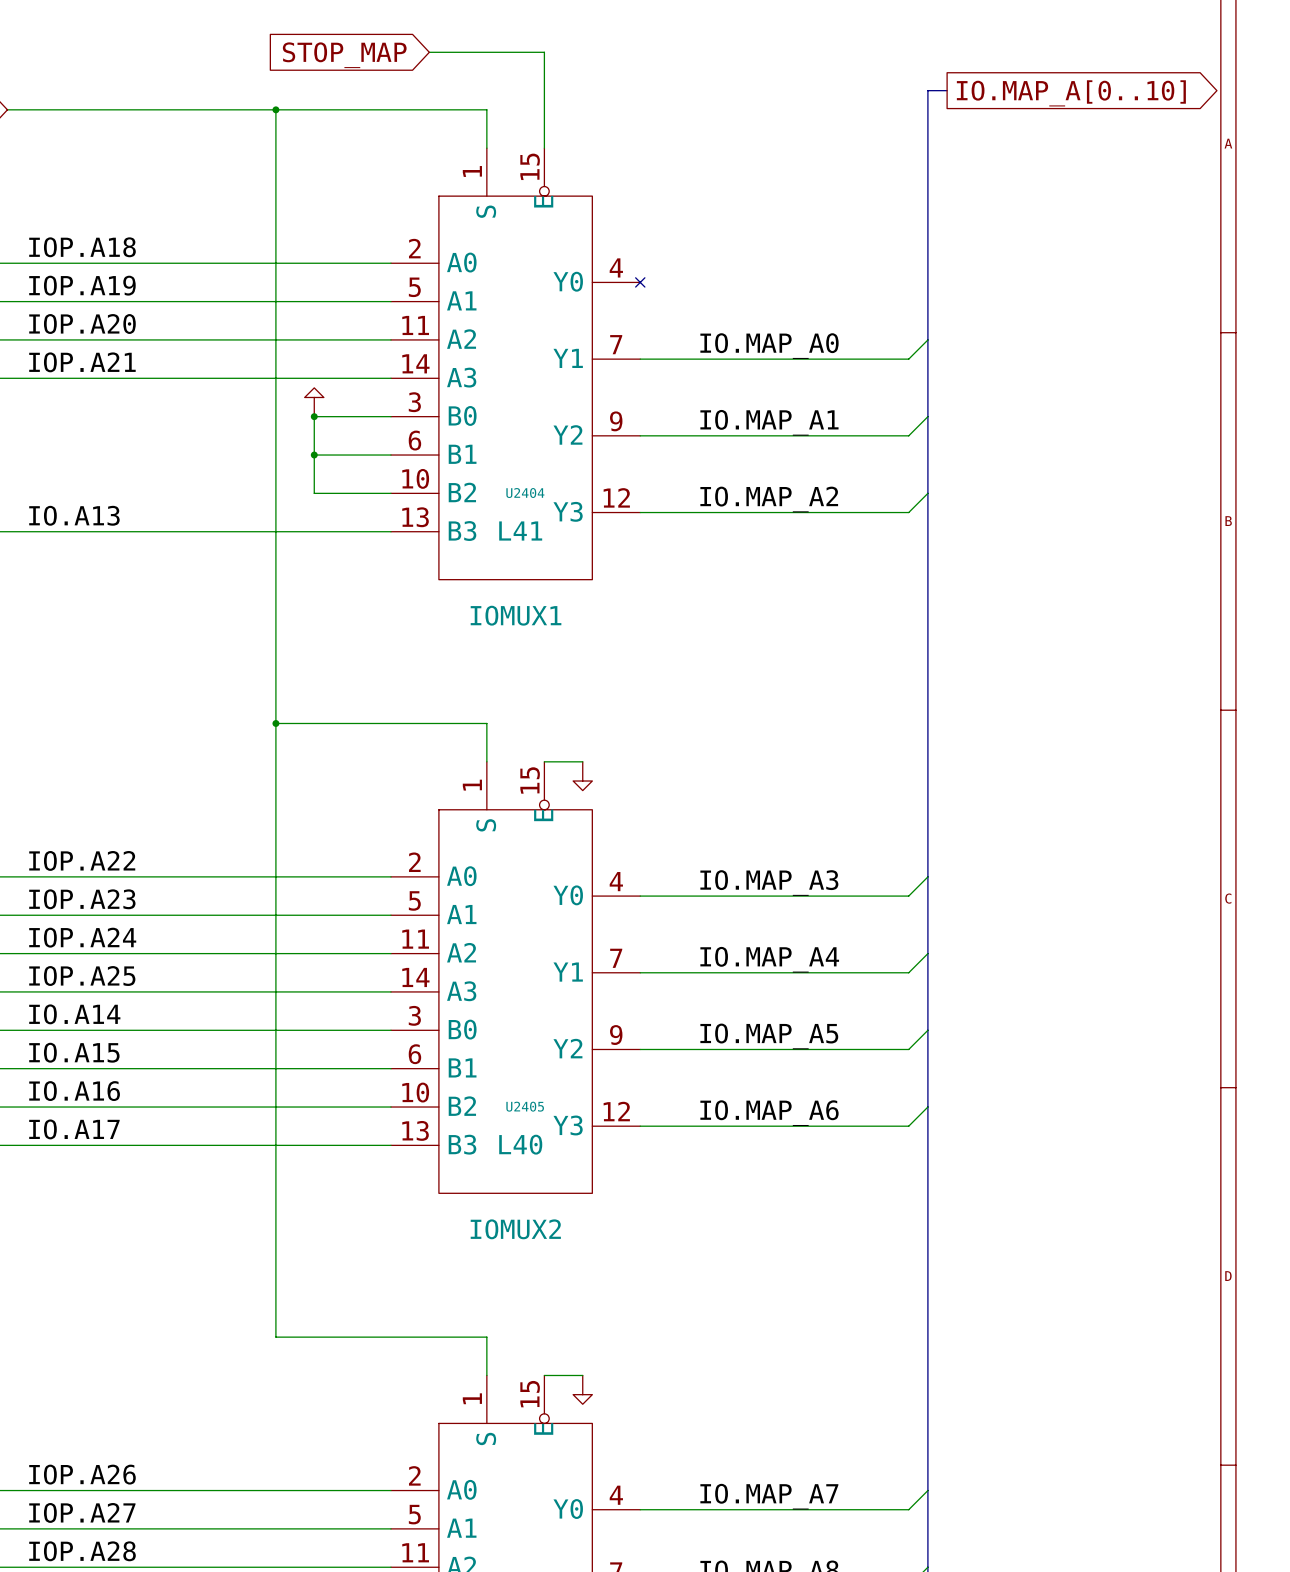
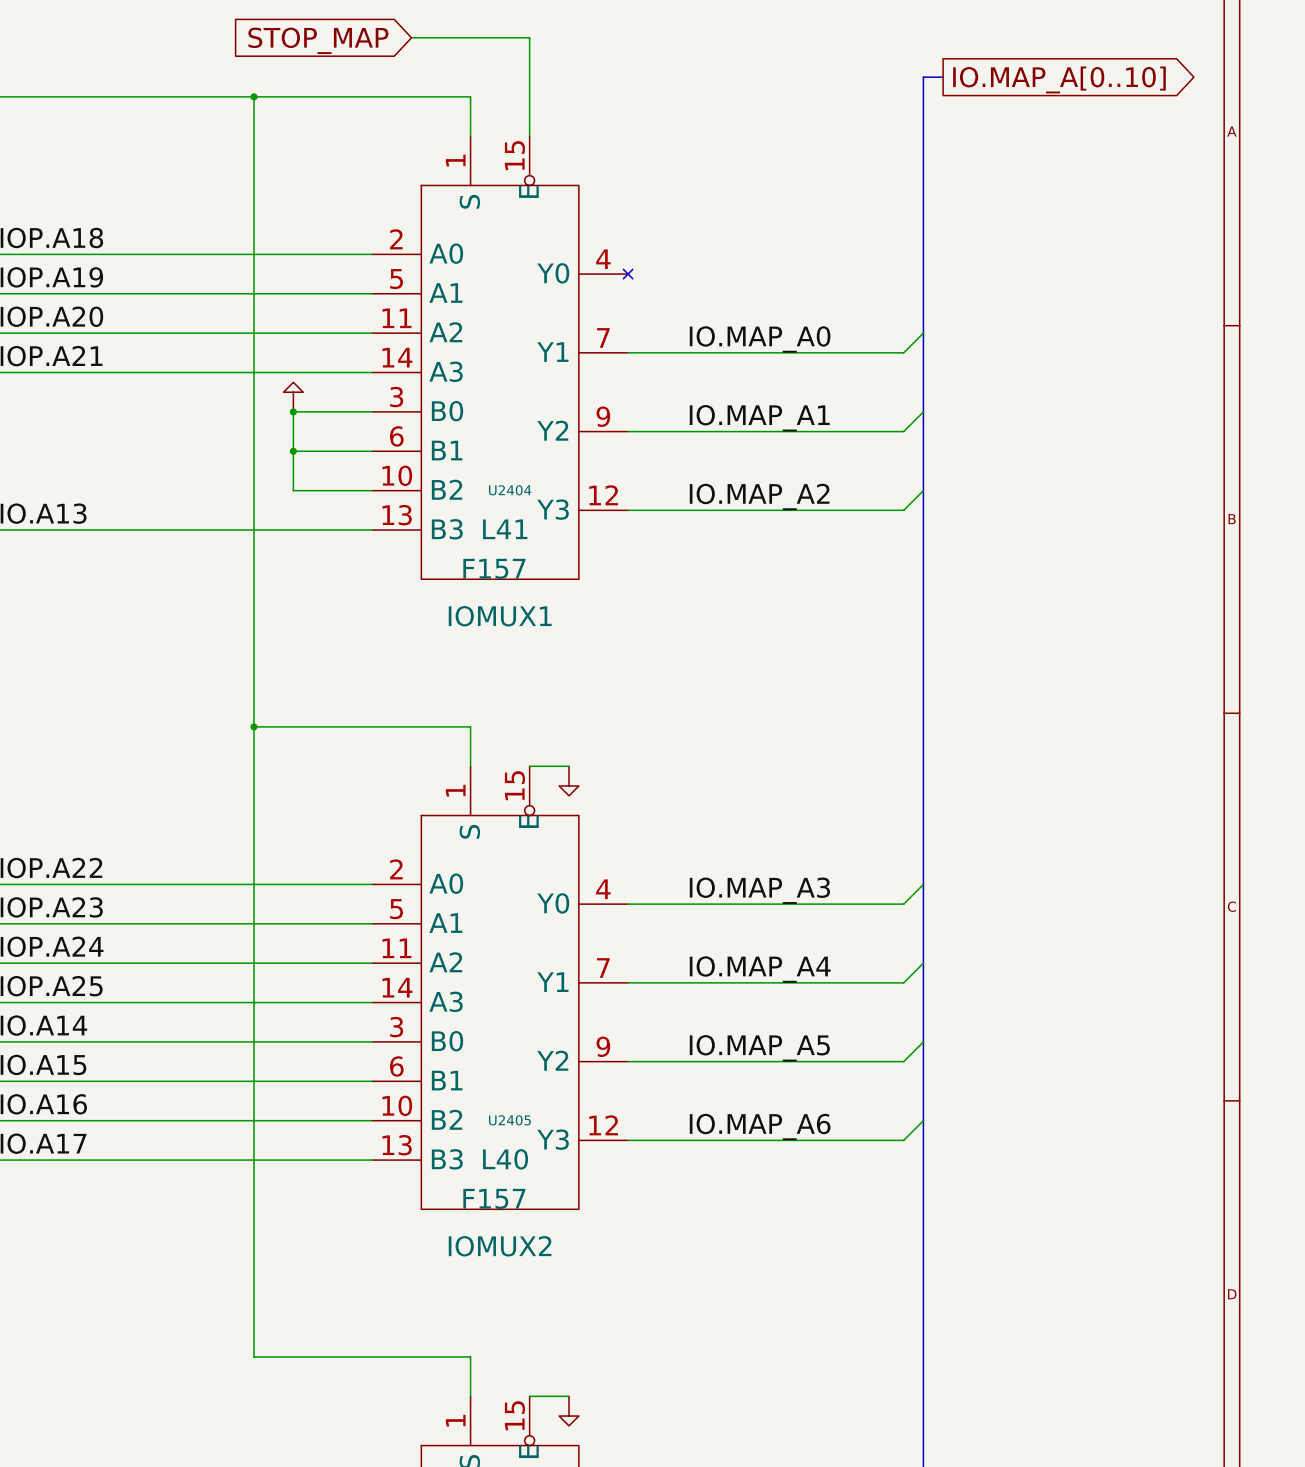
U2404 value: none -> F157 (494, 568)
U2405 value: none -> F157 (494, 1198)

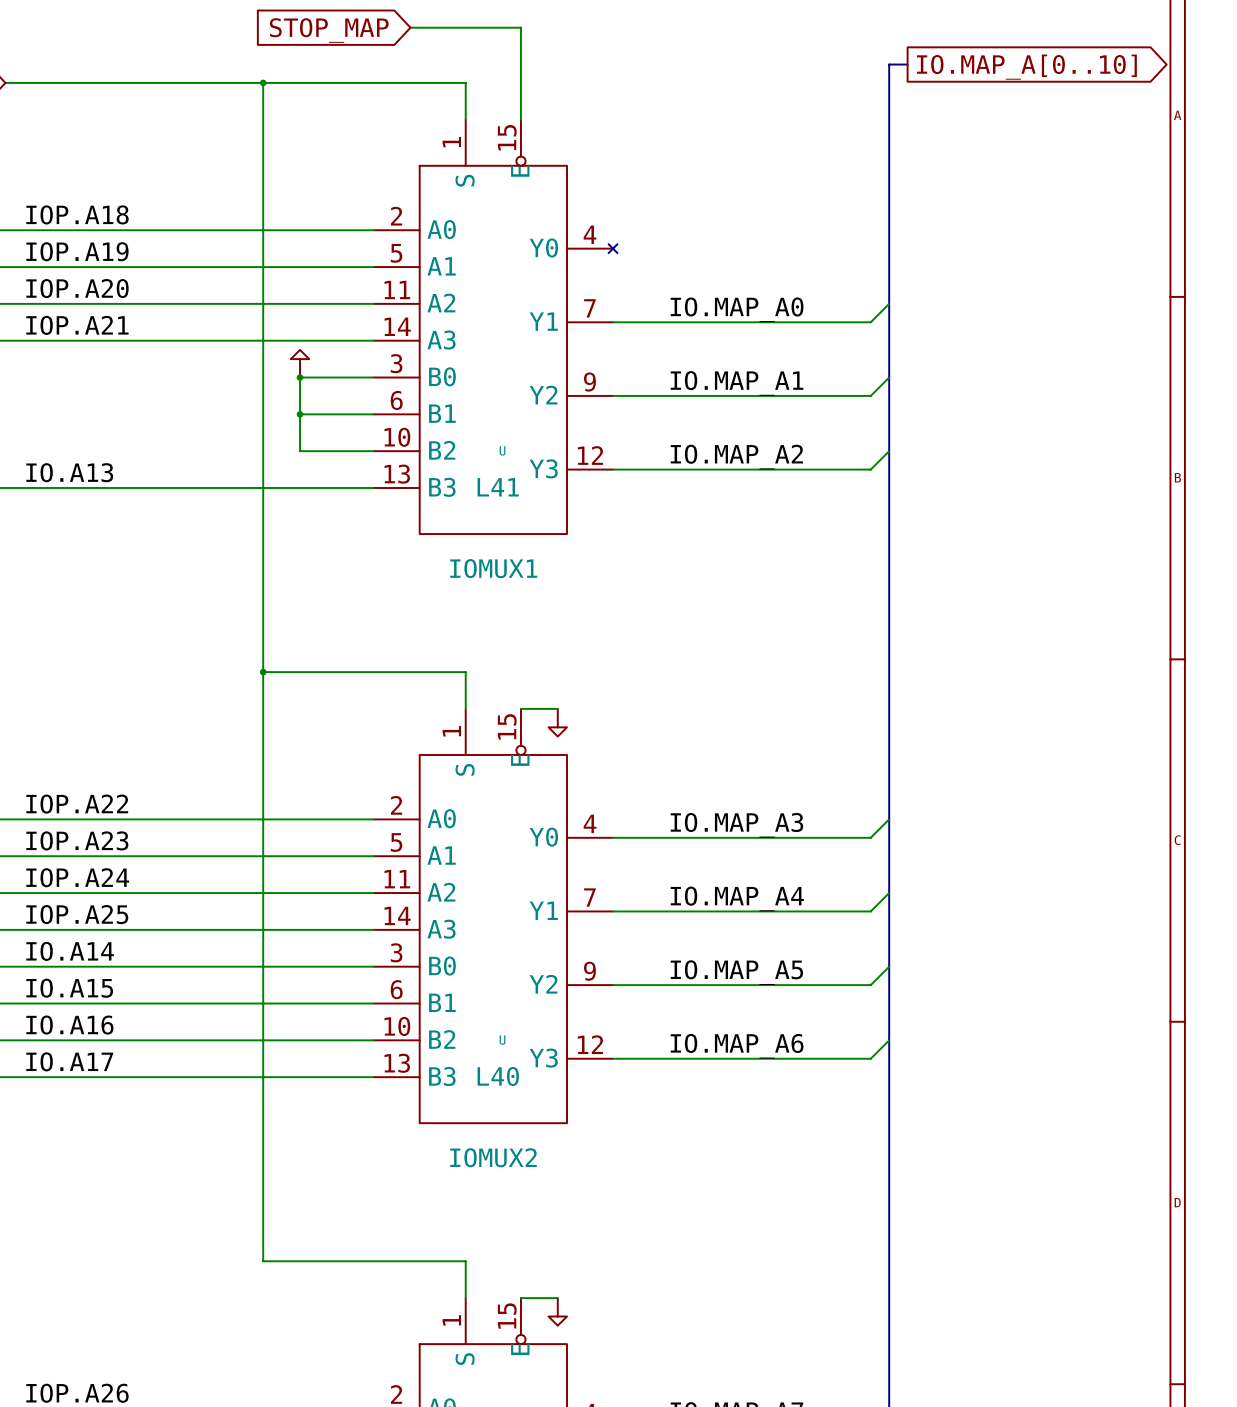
U2404 name: U2404 (510, 490) -> U (502, 450)
U2404 value: F157 (494, 568) -> none
U2405 name: U2405 (509, 1120) -> U (502, 1040)
U2405 value: F157 (494, 1198) -> none

